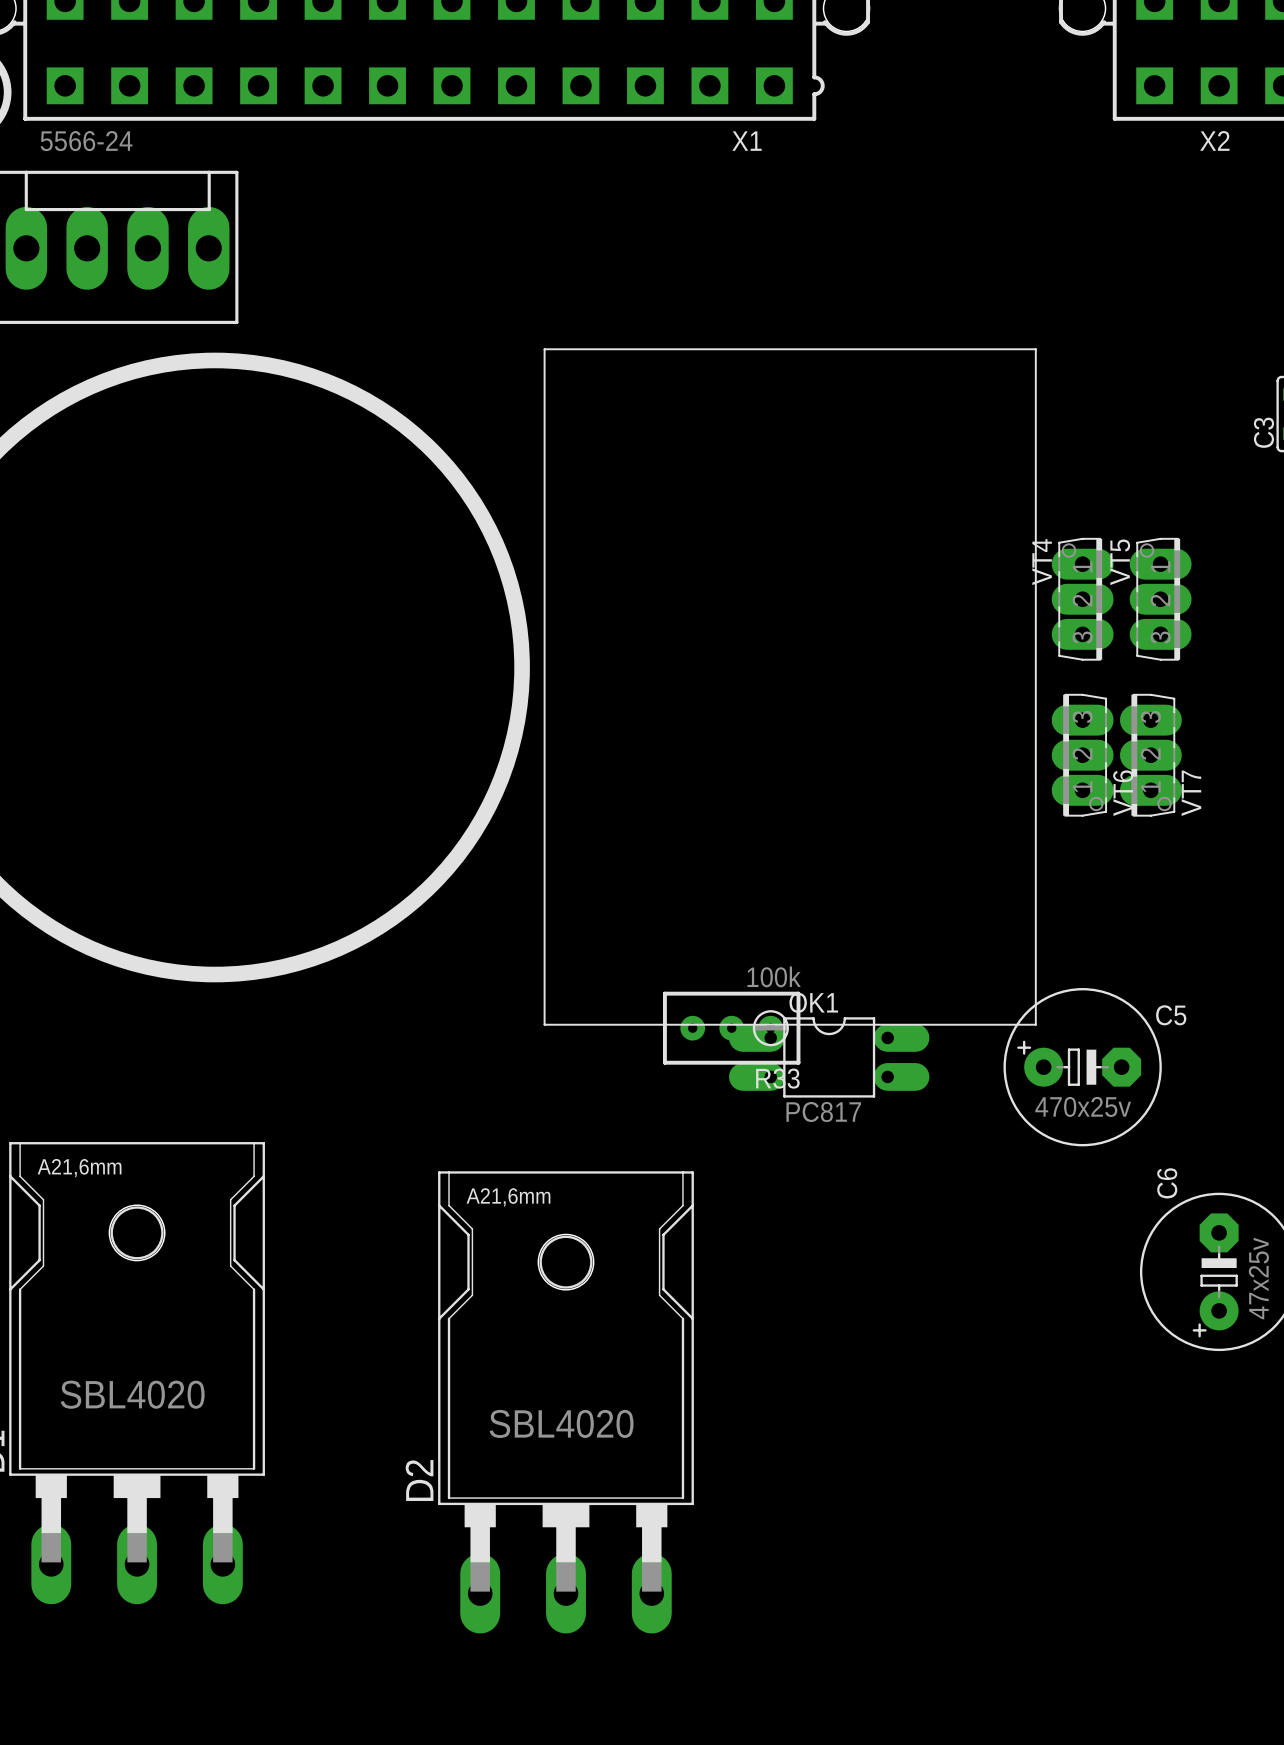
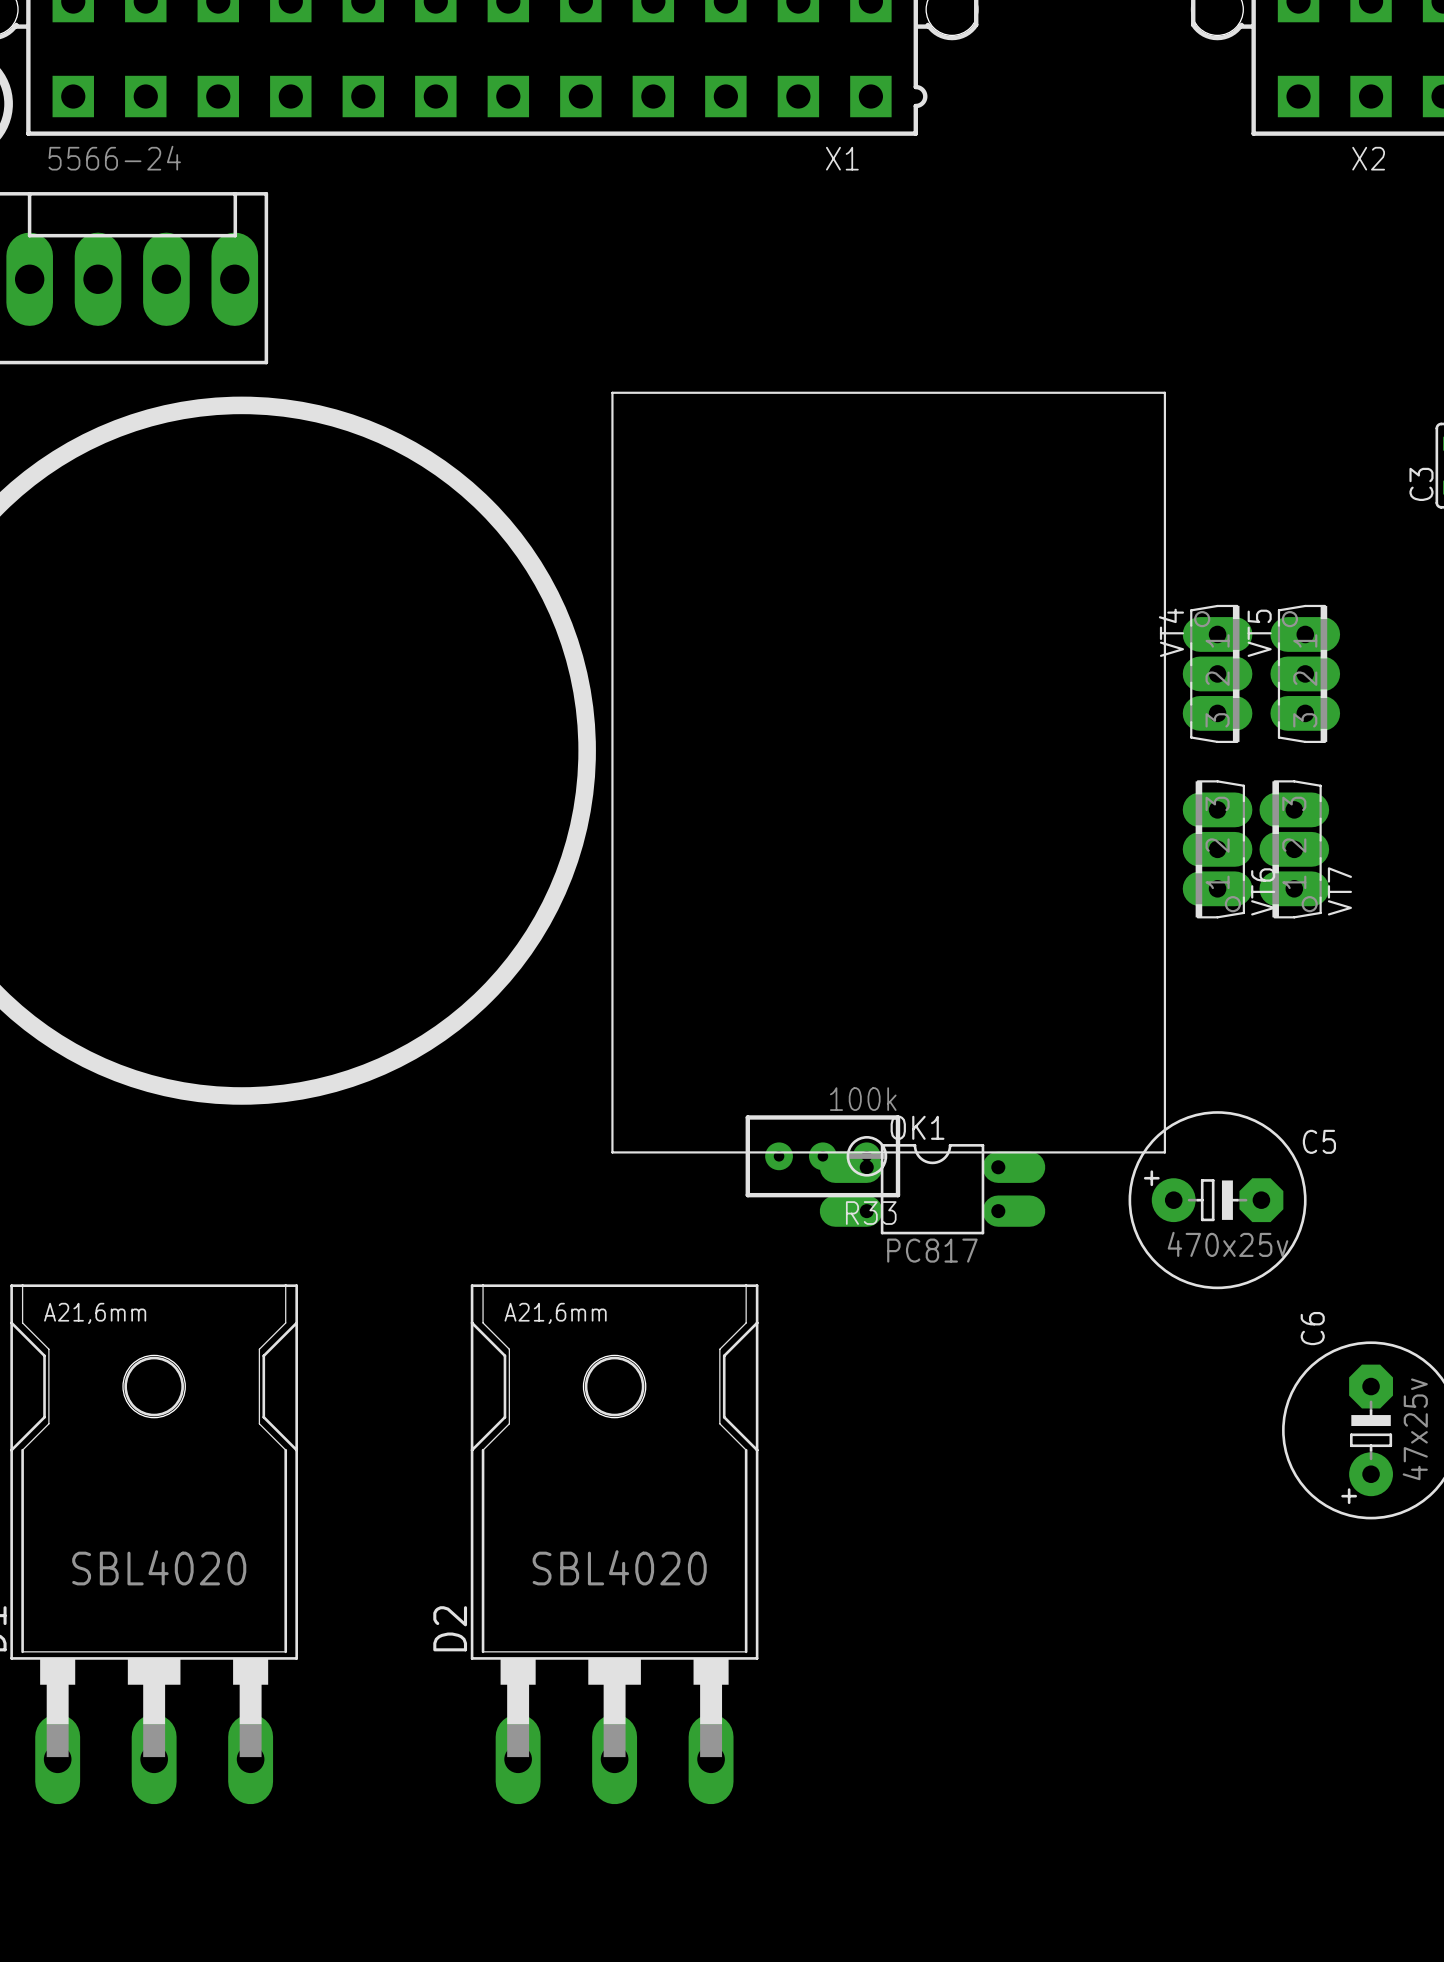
D2 position: (565, 1402) -> (614, 1544)

